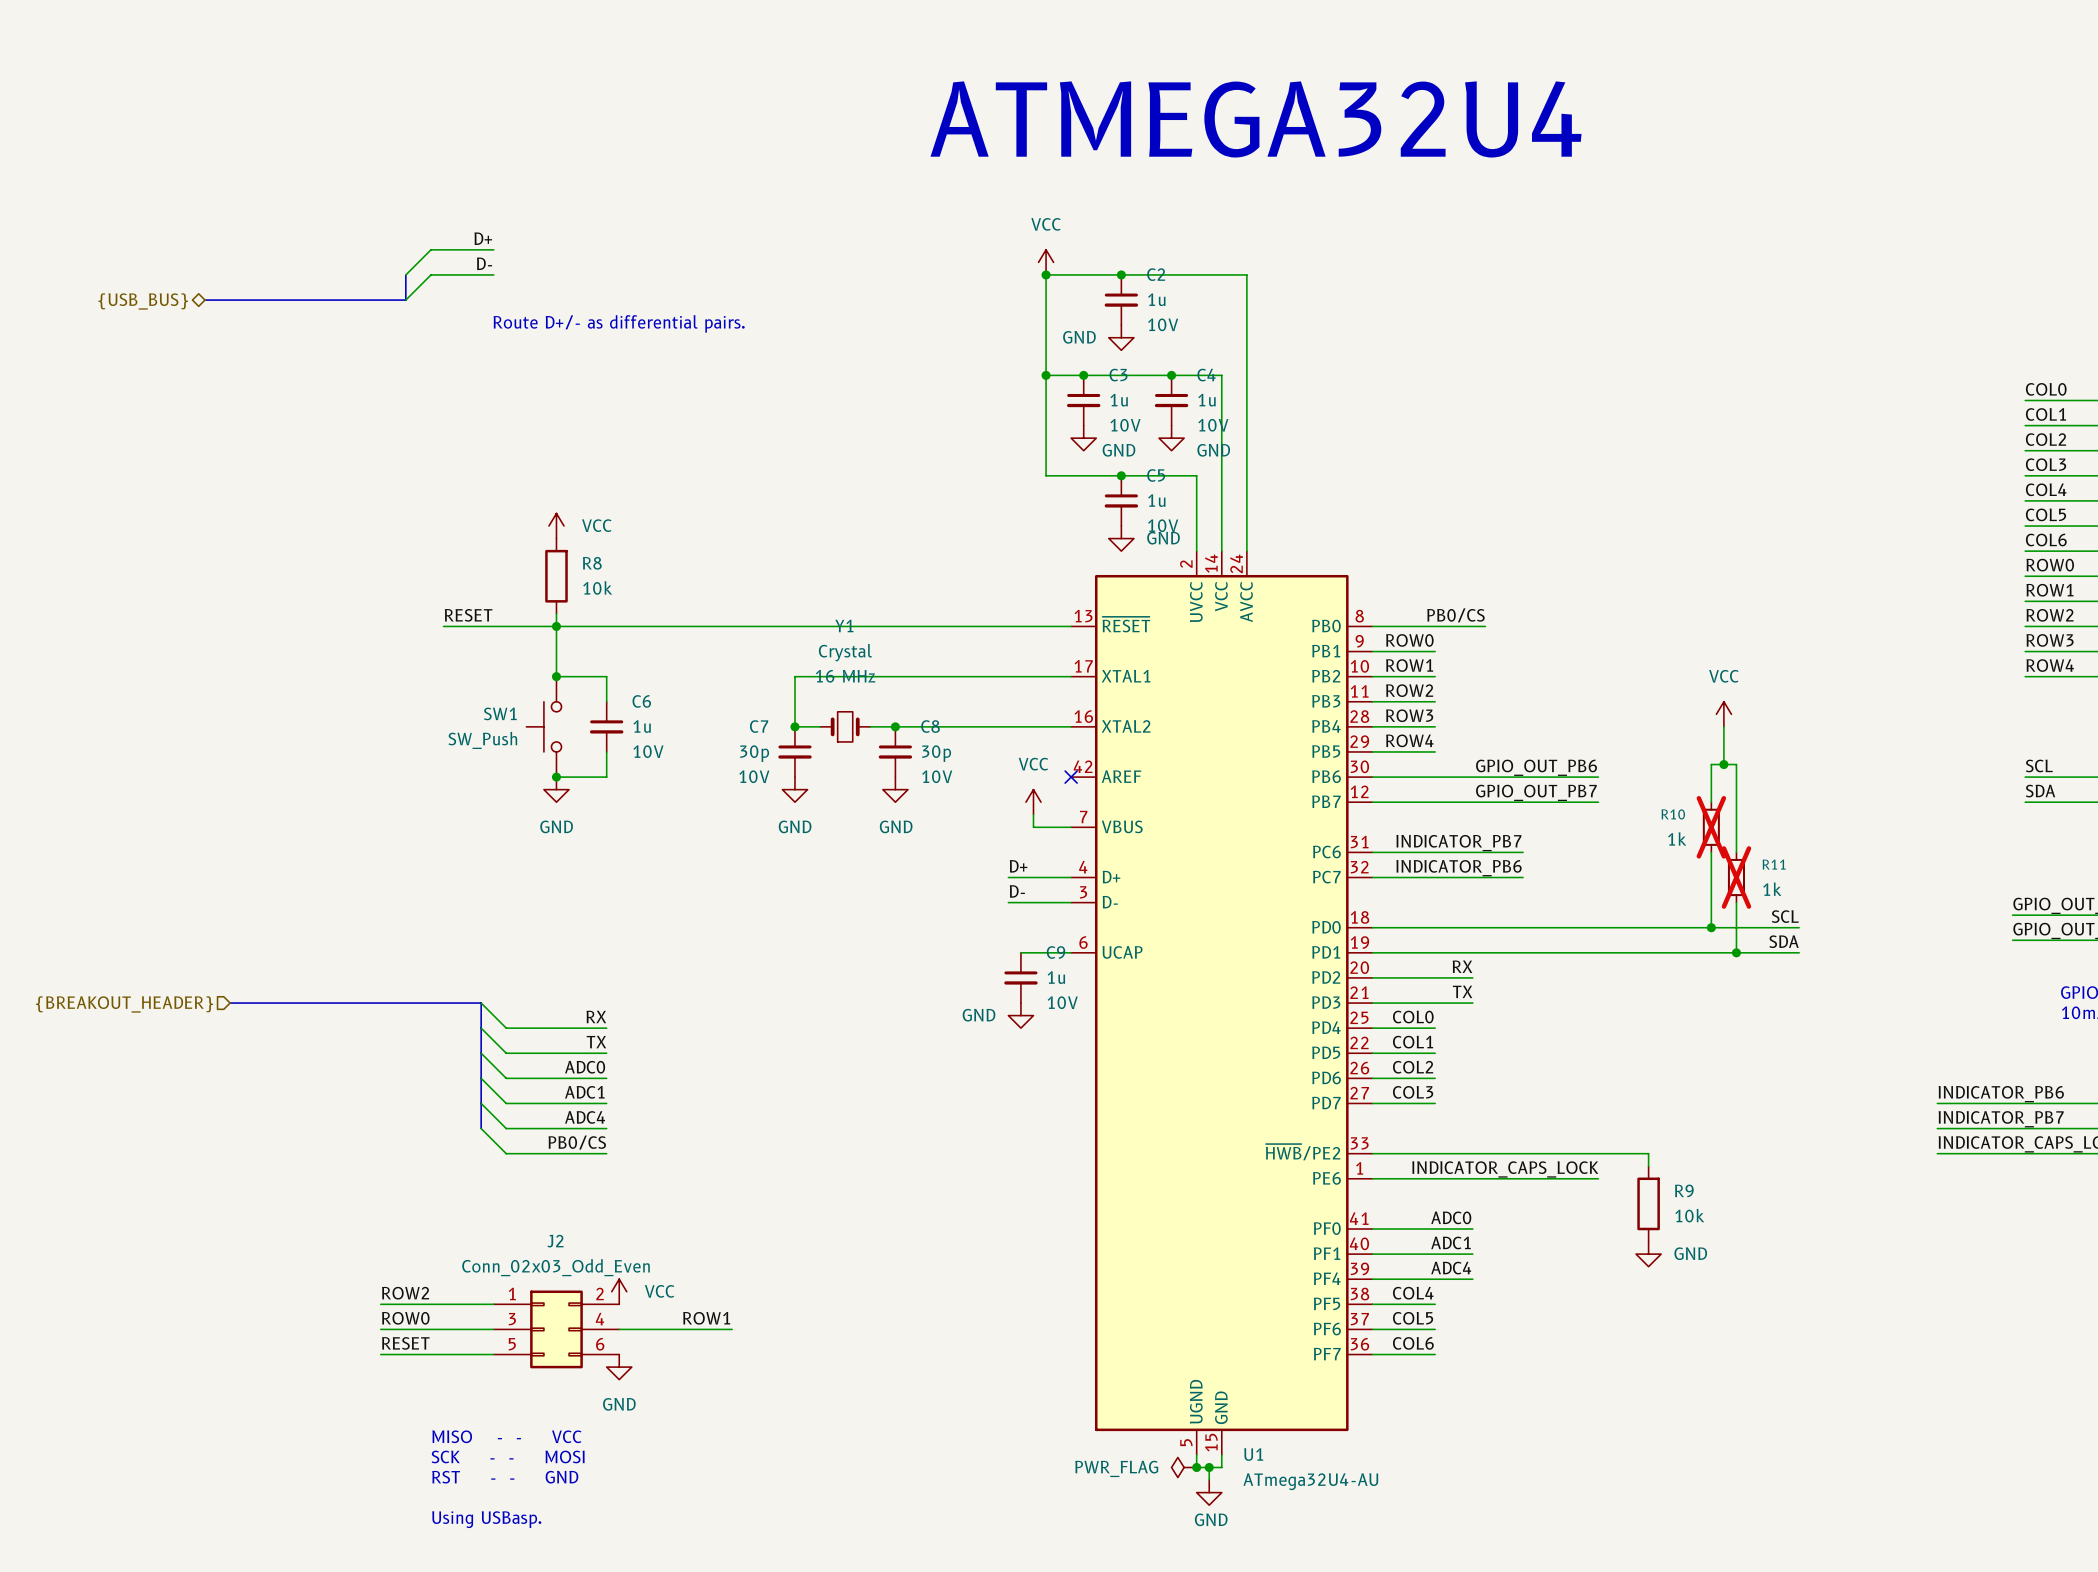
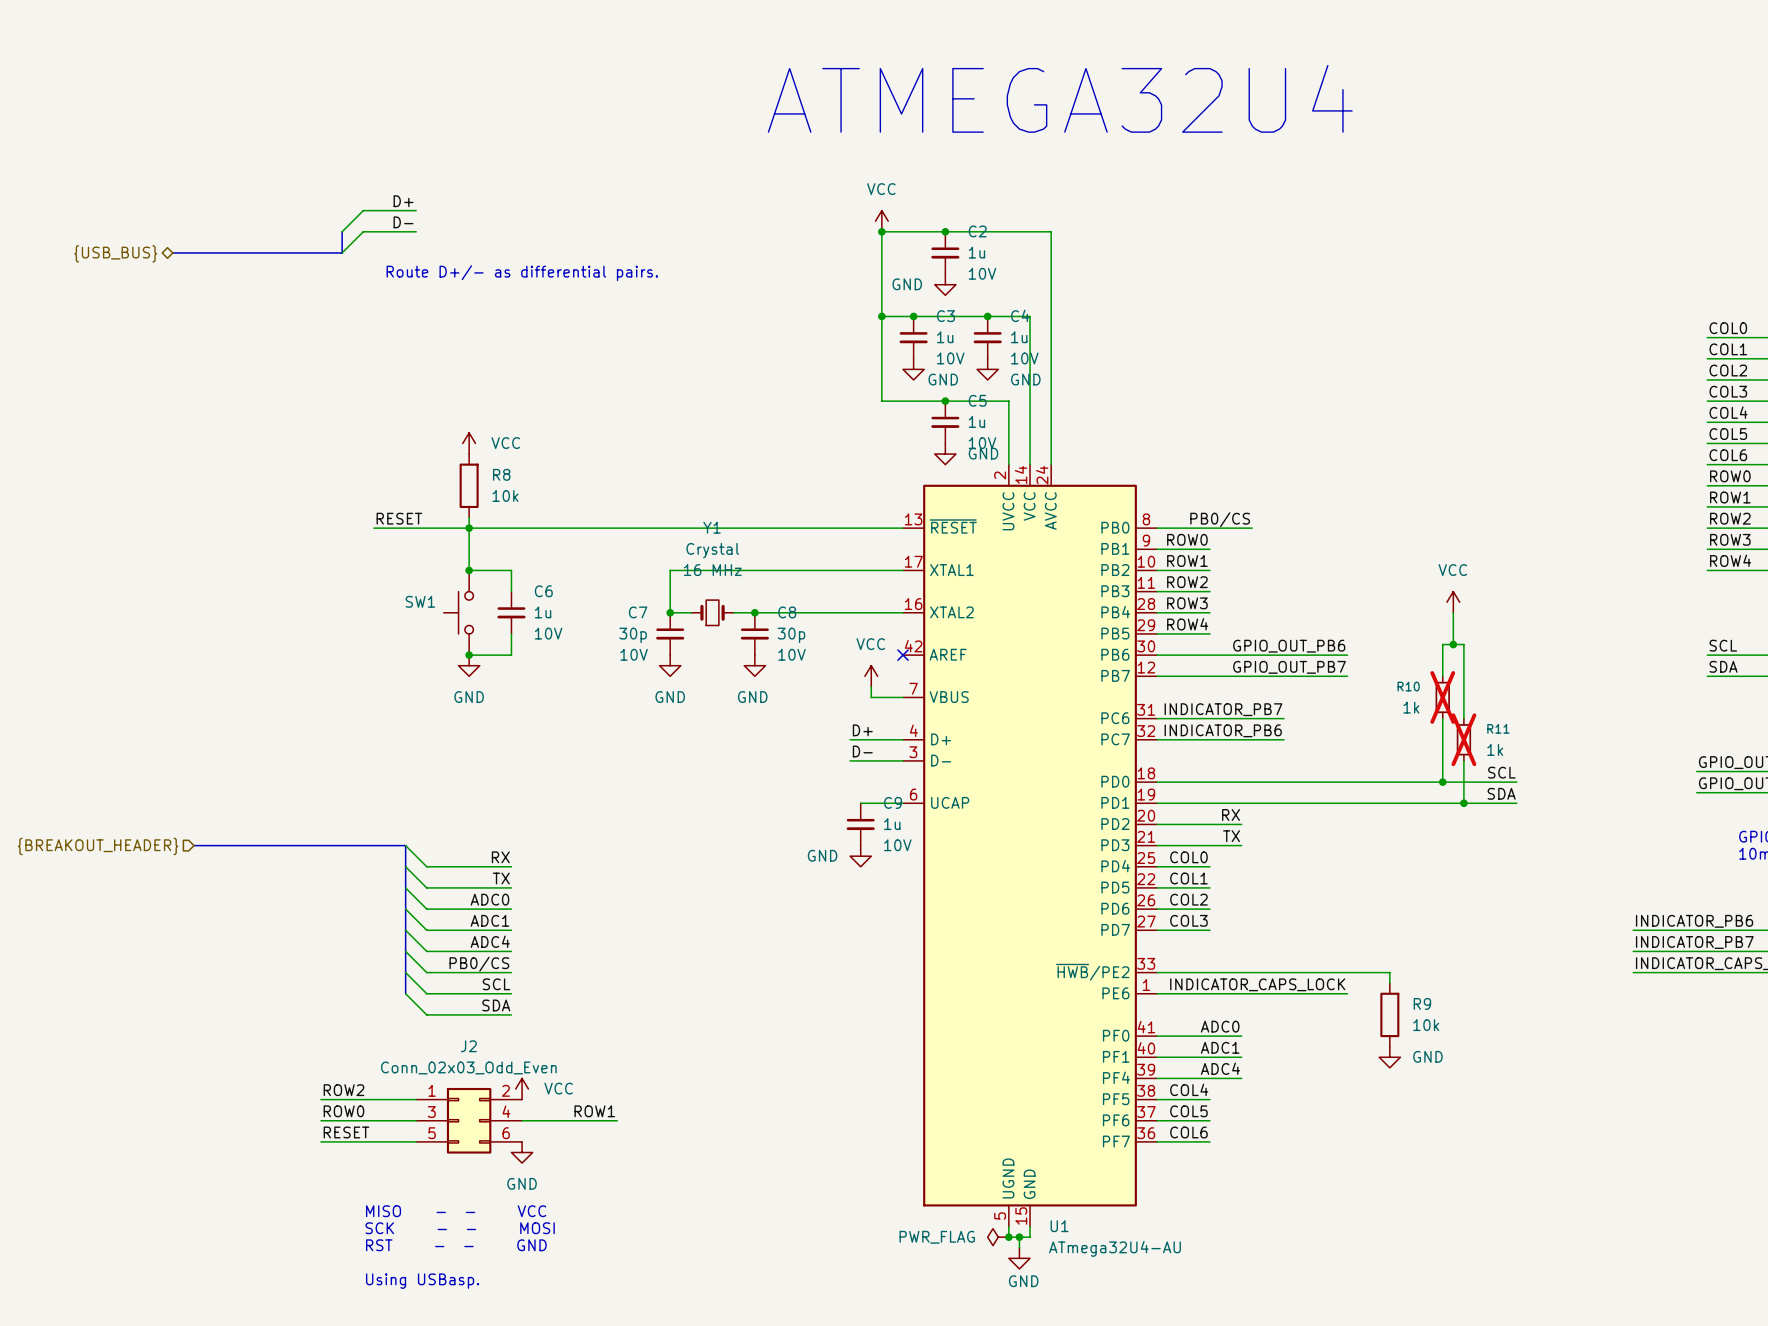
SW1 value: SW_Push (482, 740) -> none
bus: none -> (405, 951) (405, 993)
wire: none -> (405, 972) (426, 993) (511, 993)
label: none -> SCL (496, 984)
wire: none -> (405, 993) (426, 1014) (511, 1014)
label: none -> SDA (496, 1005)

